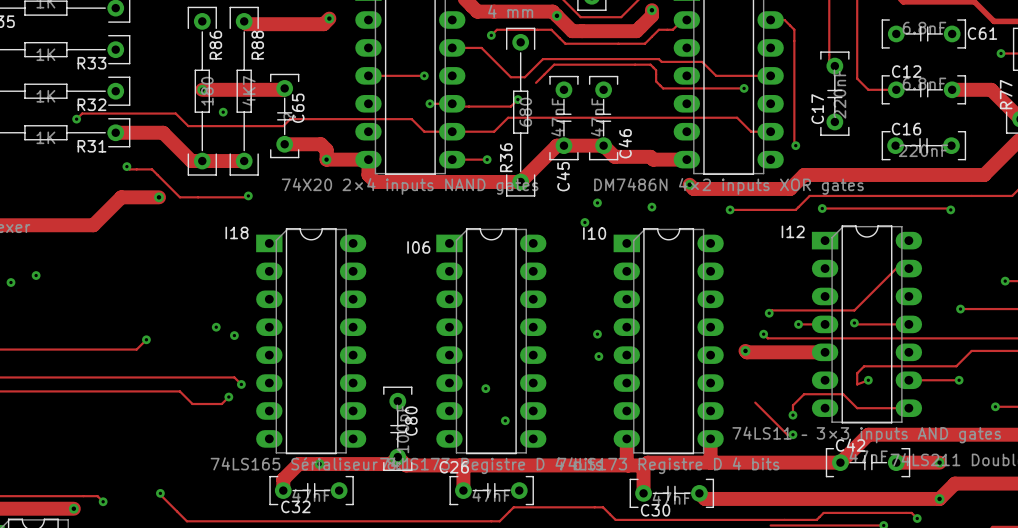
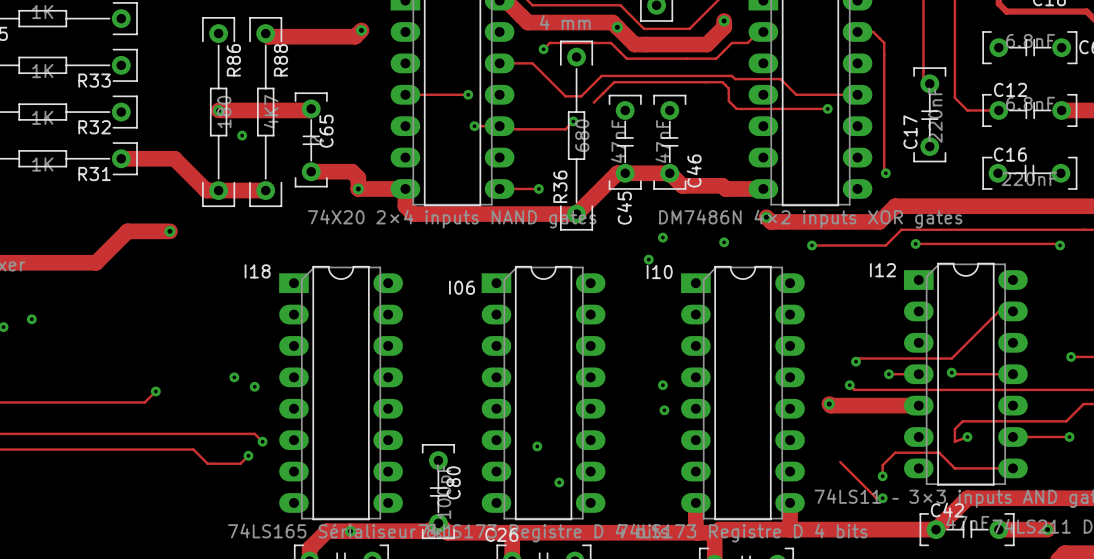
track: (76, 119) (82, 113) (175, 113) (188, 126) (283, 126) (290, 119) (411, 119) (424, 131) (494, 131) (508, 117) (737, 117) (751, 131) (770, 131) -> none
via: (76, 119) -> none
track: (126, 166) (129, 169) (152, 169) (179, 197) (248, 195) -> none
via: (126, 166) -> none
via: (248, 195) -> none

